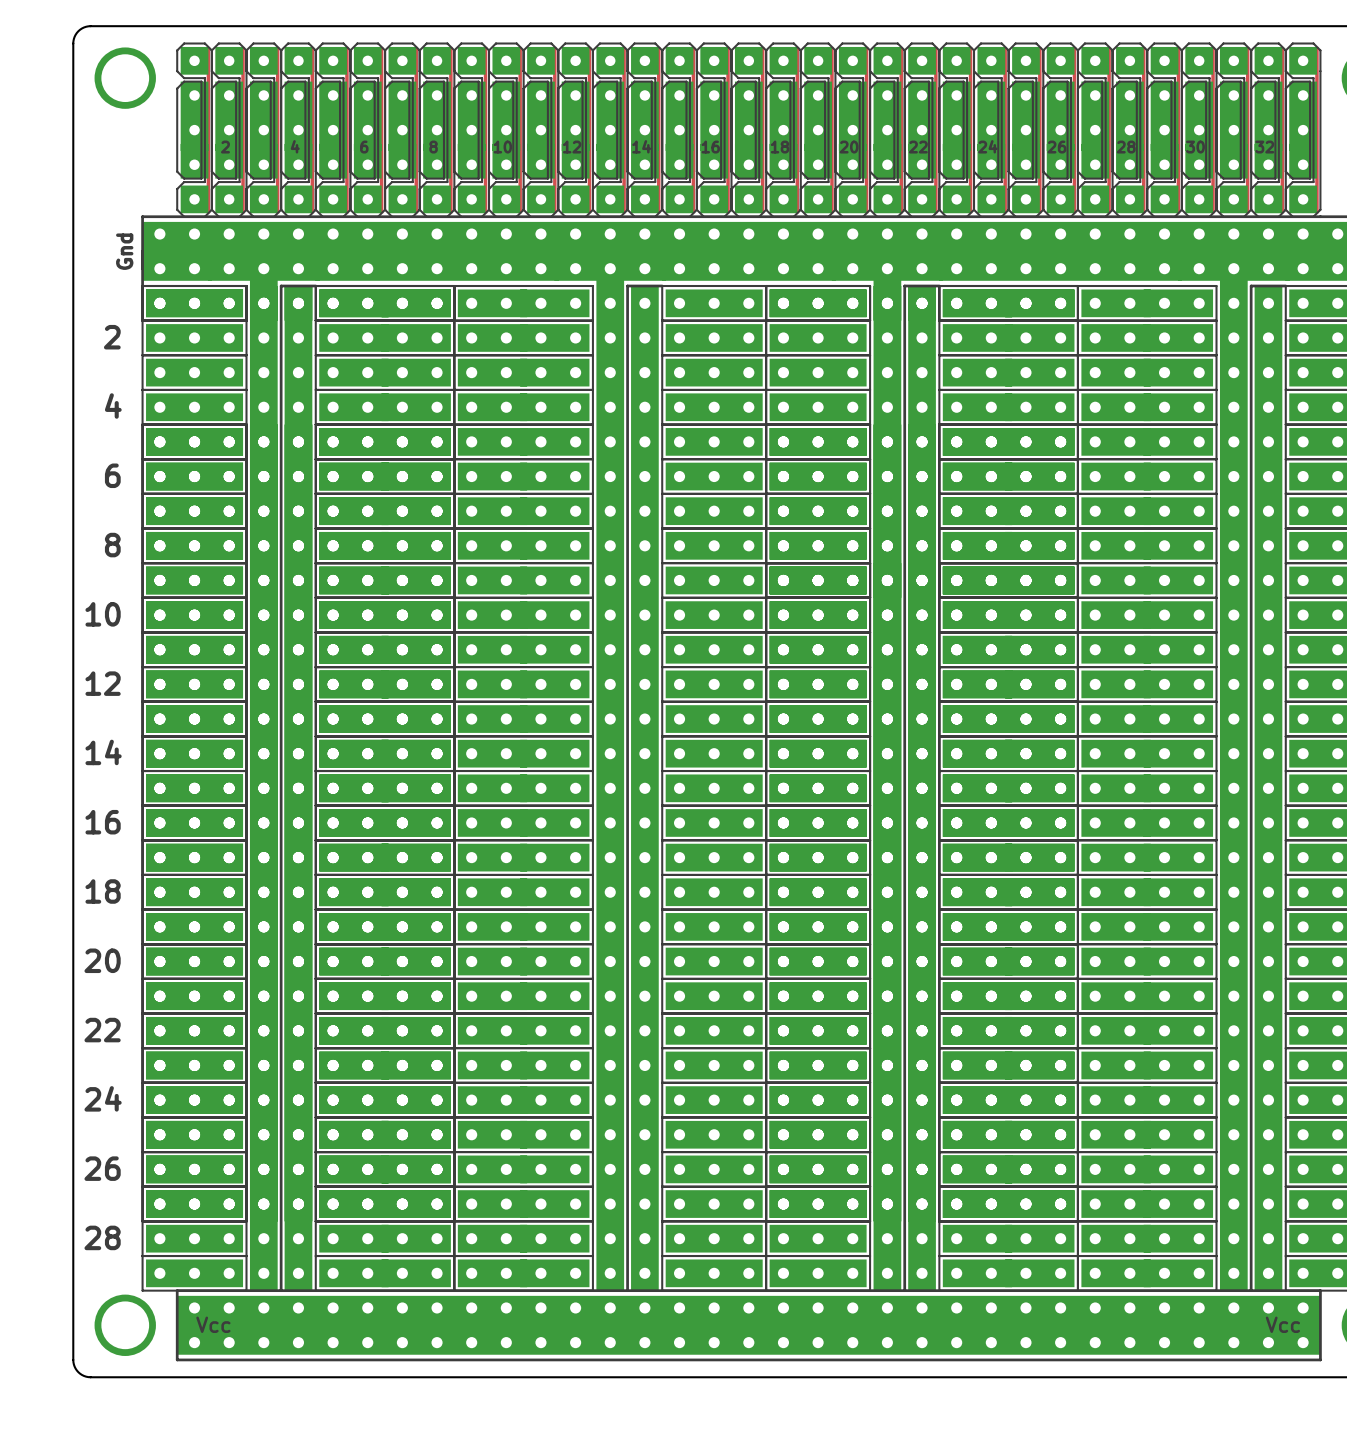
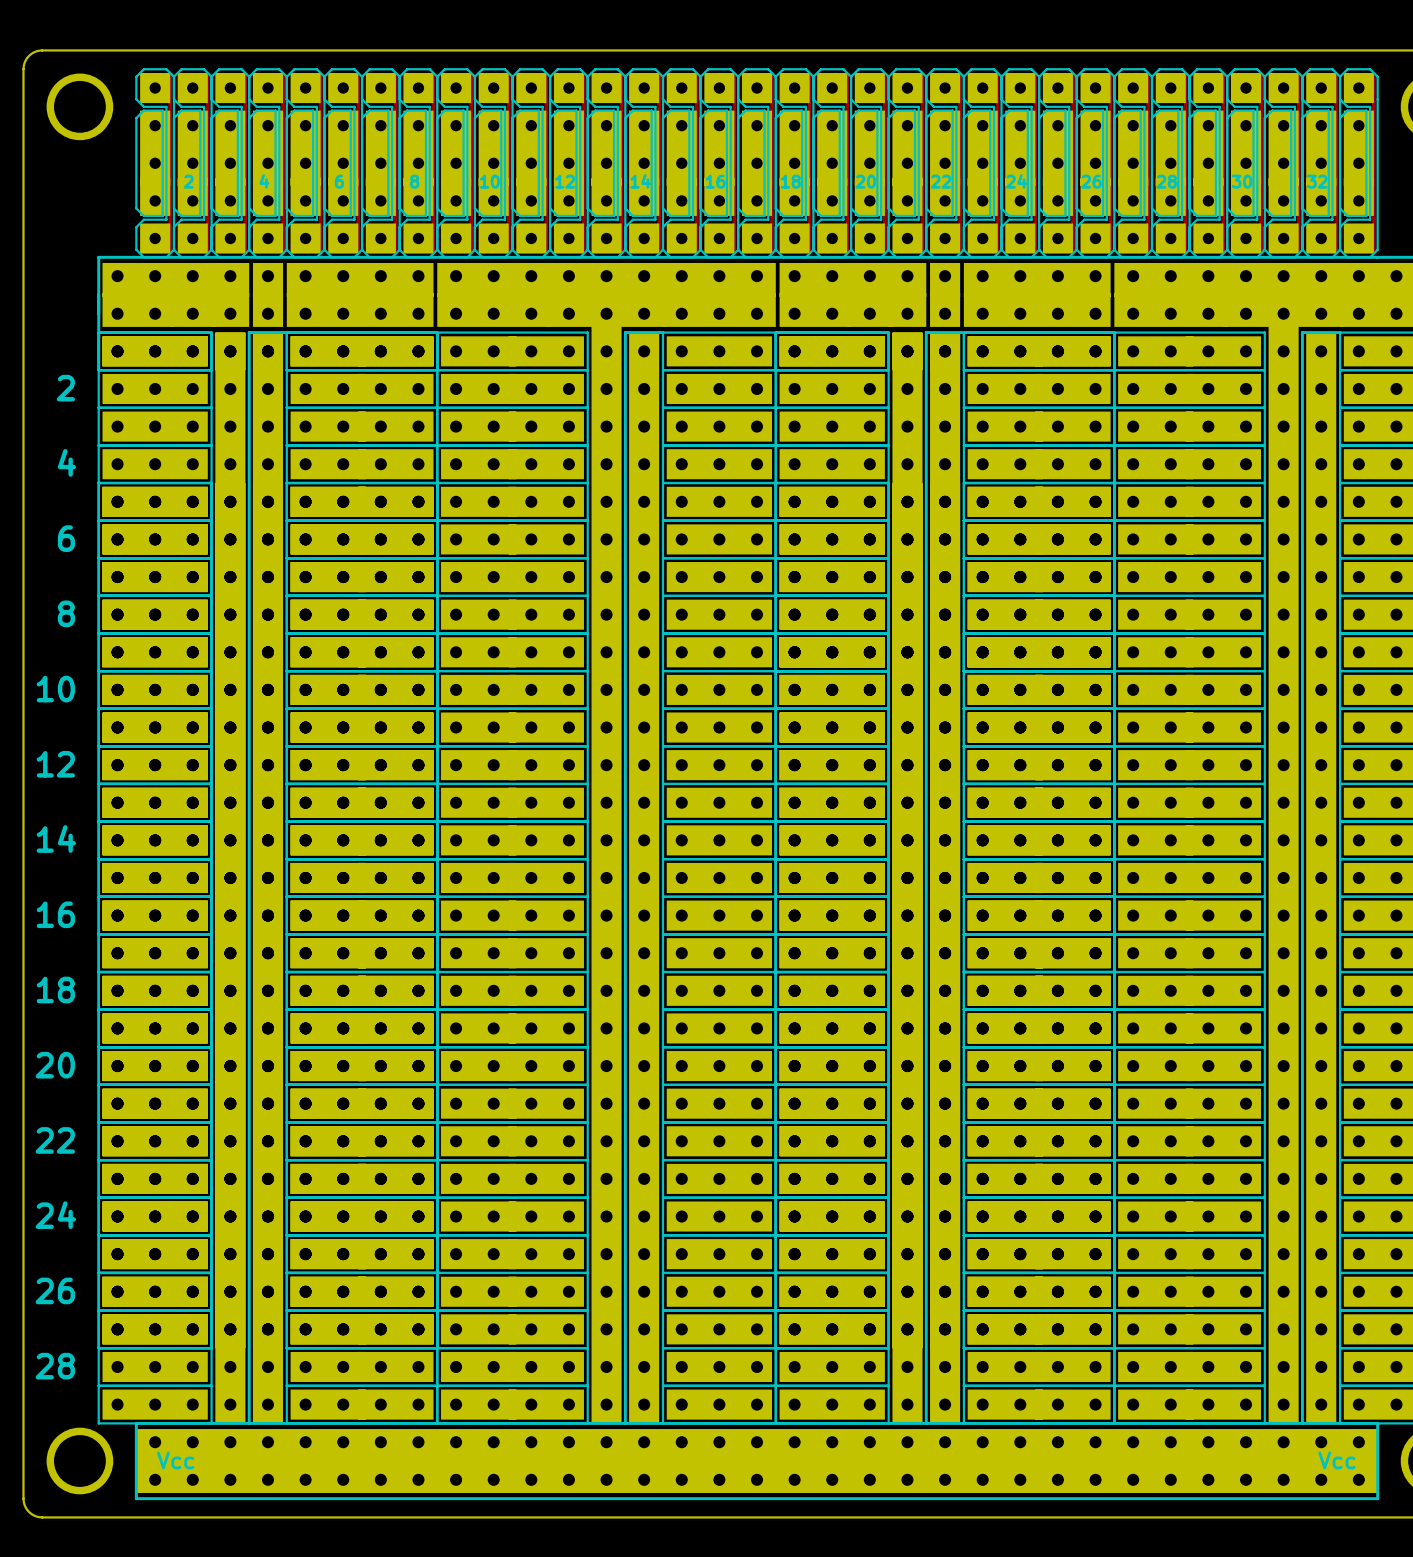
part footprint: [142, 221, 455, 287] -> [102, 262, 434, 327]
part footprint: [766, 221, 1078, 287] -> [779, 262, 1111, 327]
text: Gnd (124, 251) -> none

